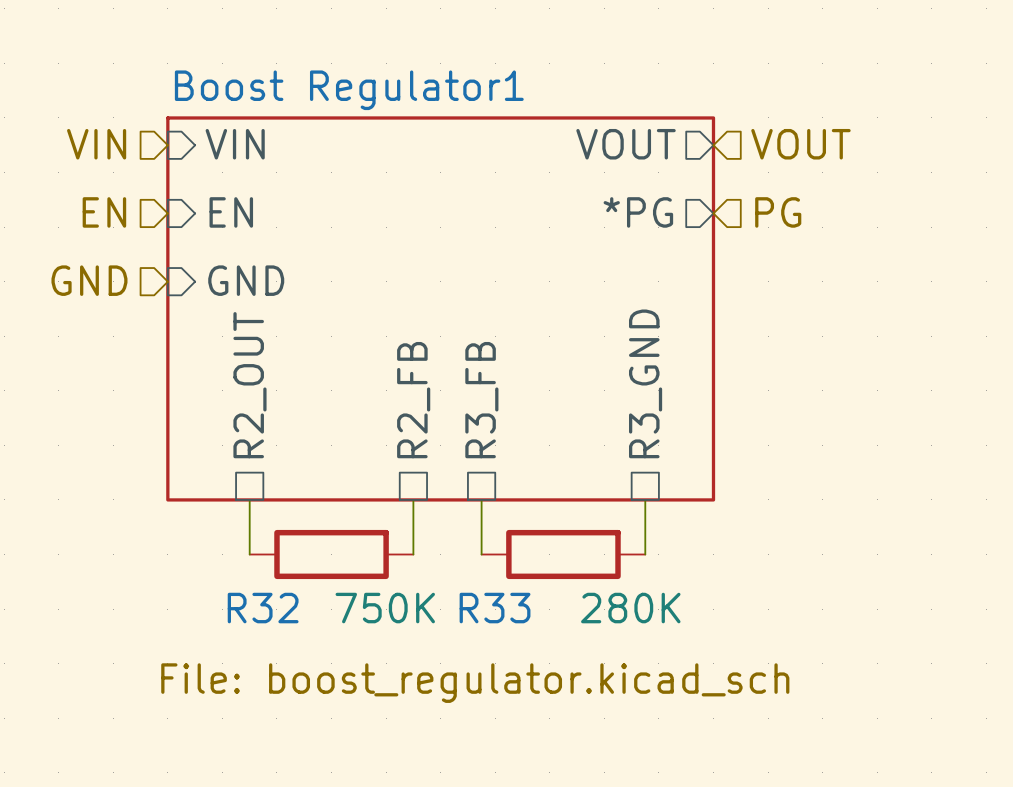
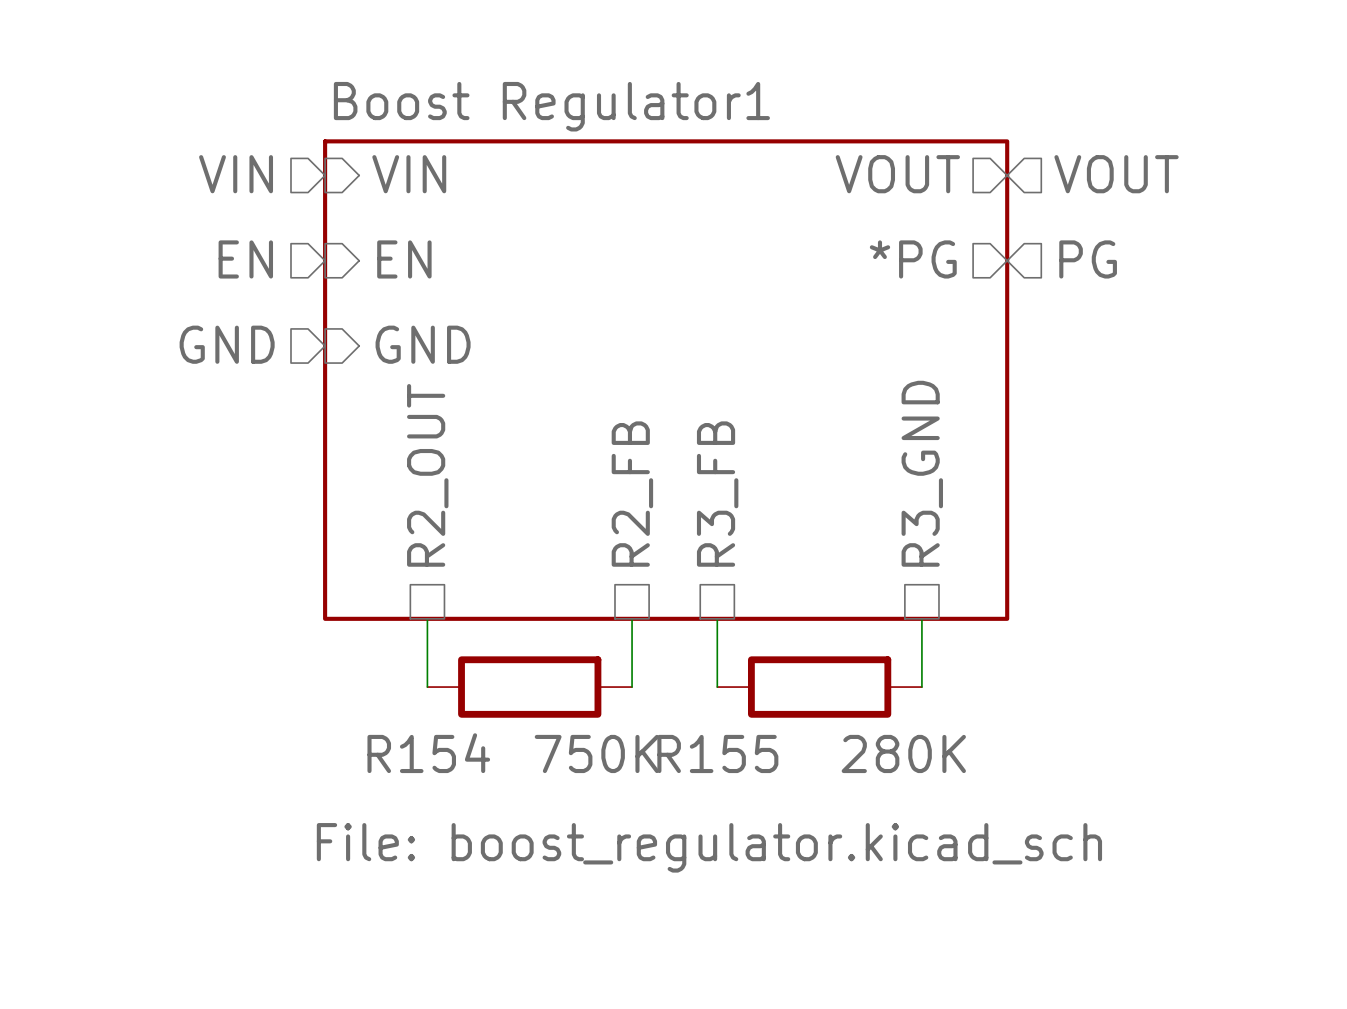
R32 name: R32 (263, 608) -> R154 (428, 753)
R33 name: R33 (495, 608) -> R155 (717, 753)

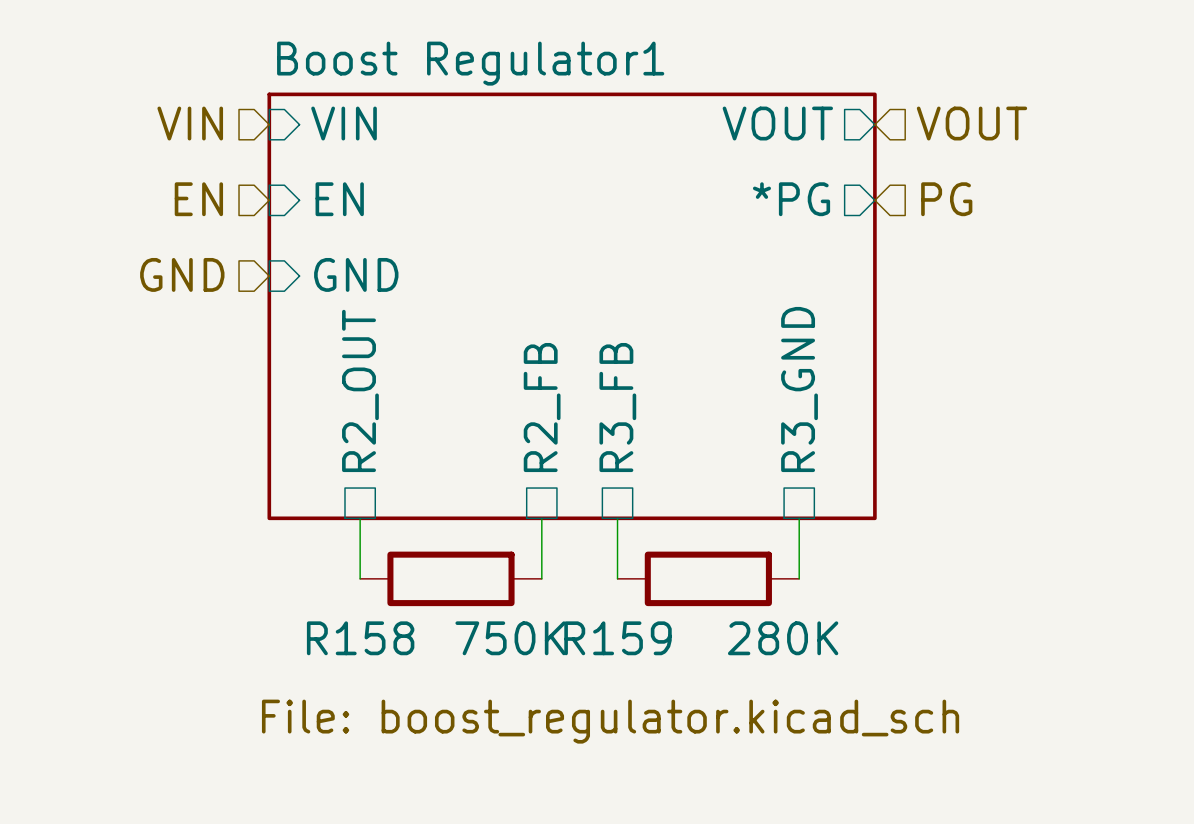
R154 name: R154 (428, 753) -> R158 (360, 638)
R155 name: R155 (717, 753) -> R159 (618, 638)

